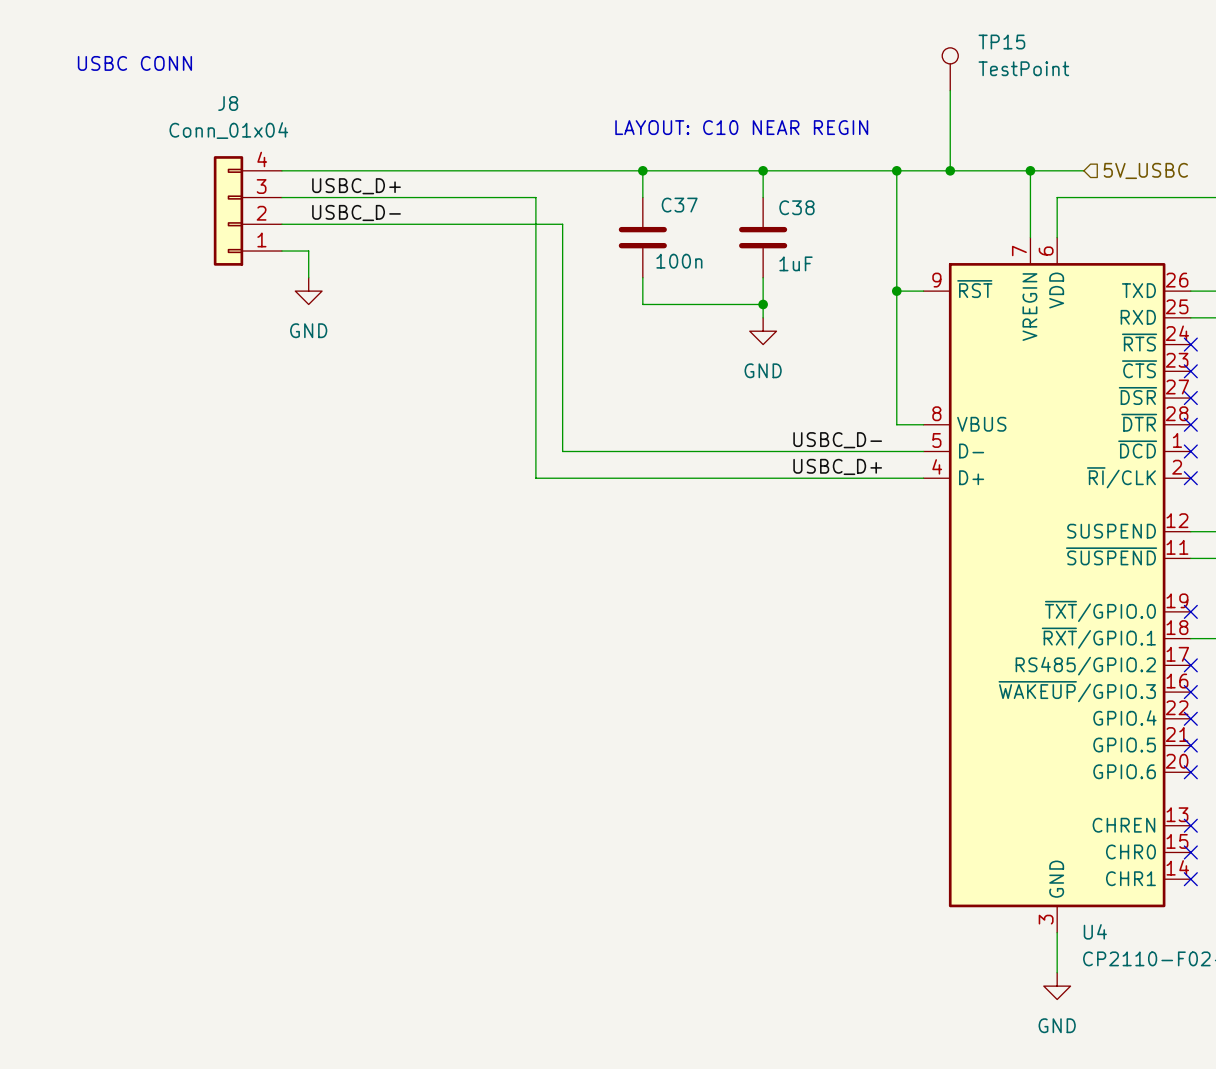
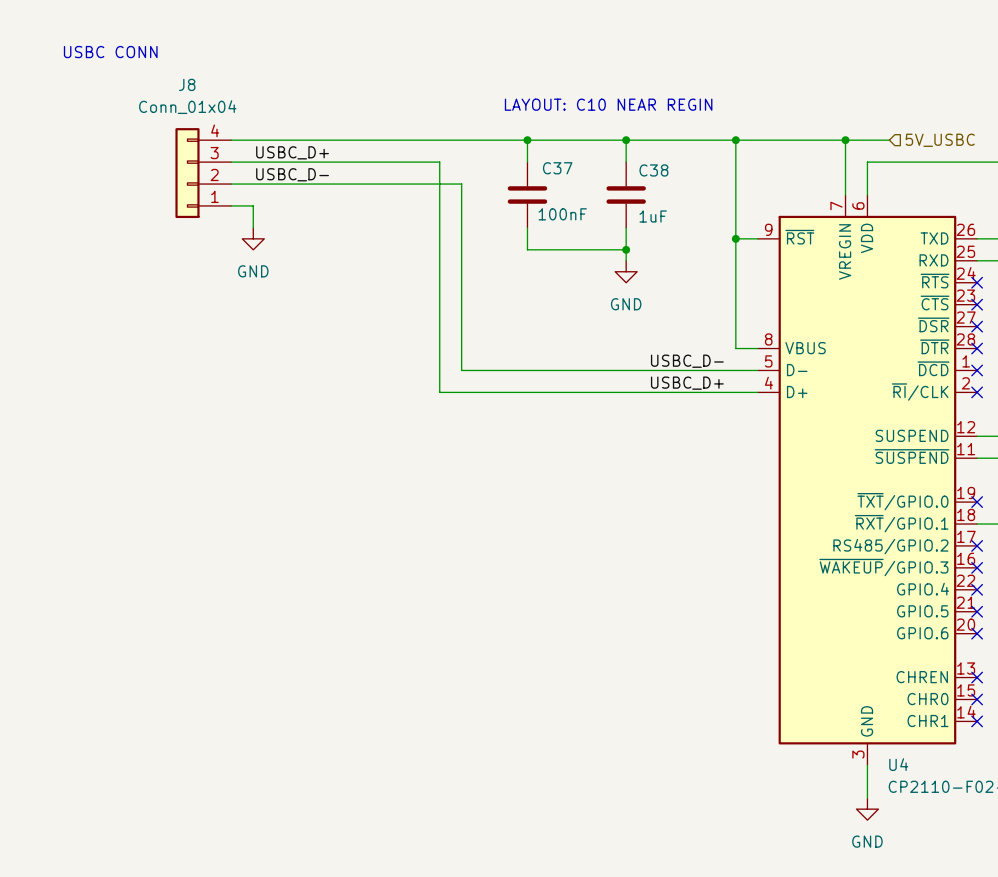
TP15: TestPoint (950, 69) -> none
wire: (950, 90) (950, 170) -> none
junction: (950, 170) -> none
C37 value: 100n (679, 261) -> 100nF (562, 214)

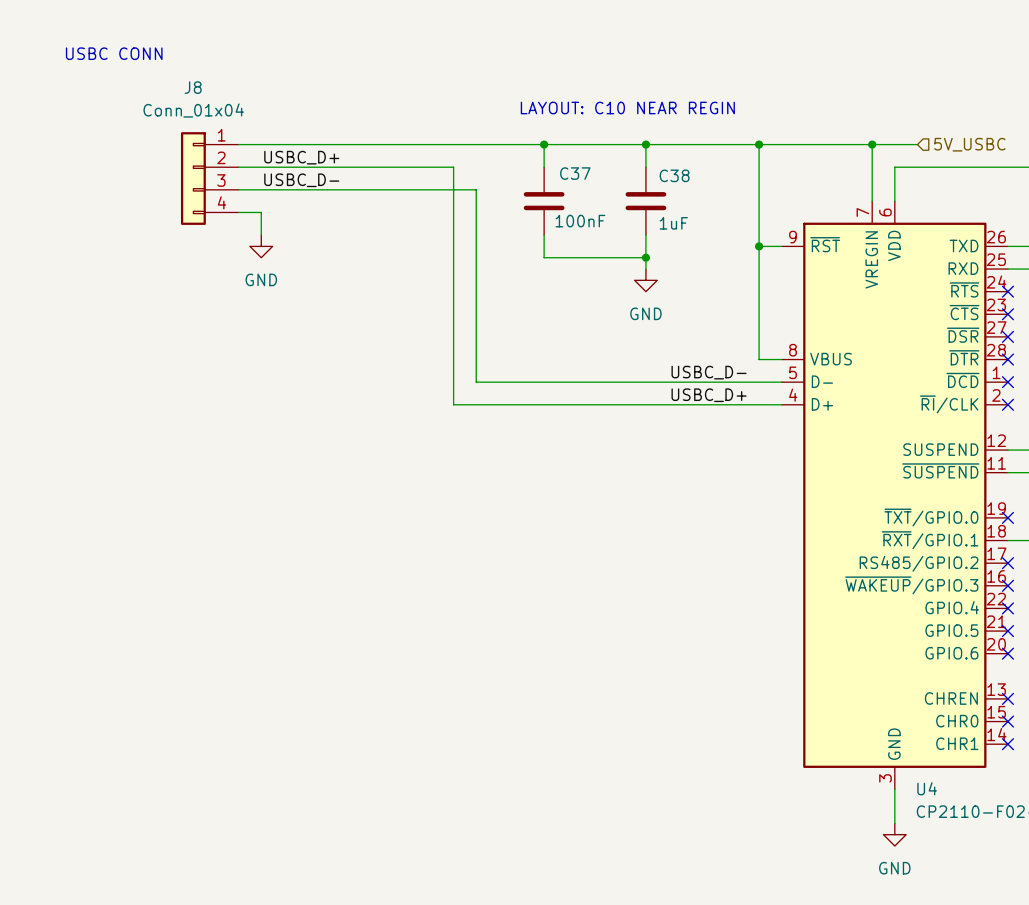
J8 flip: as is (187, 173) -> up-down (193, 178)

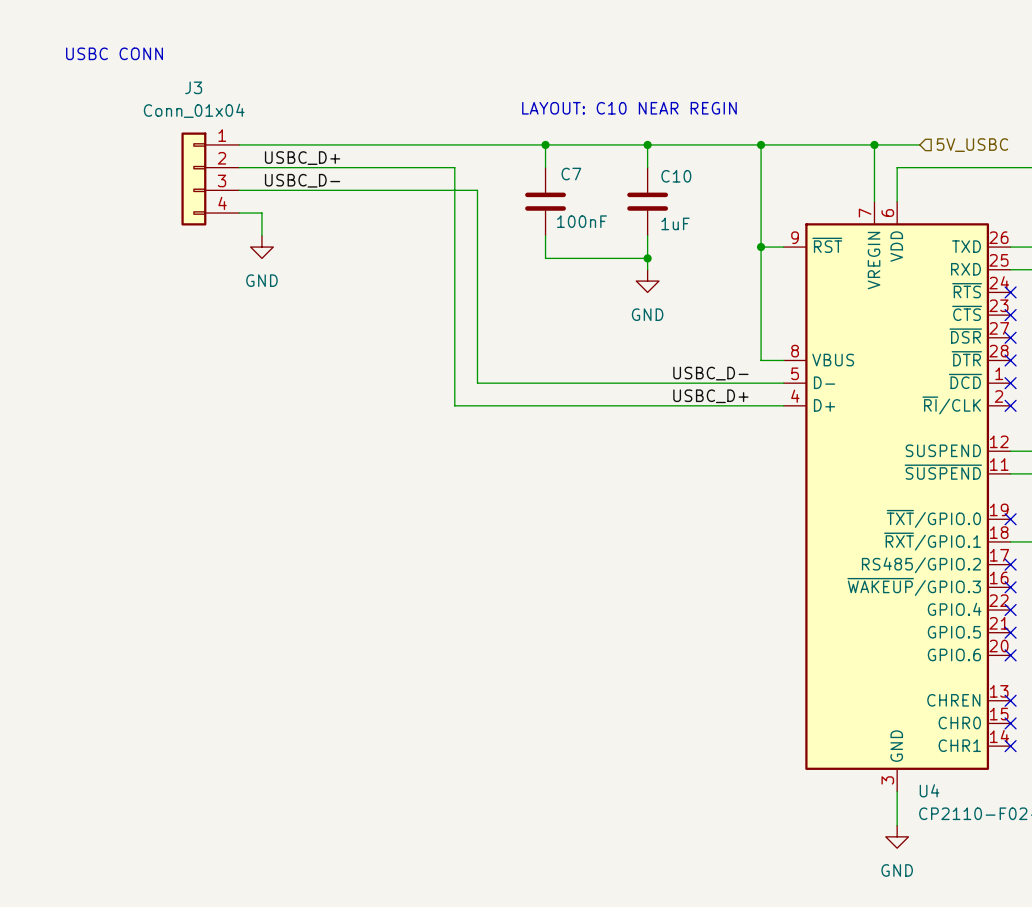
J8 name: J8 (193, 87) -> J3 (193, 87)
C37 name: C37 (575, 173) -> C7 (571, 174)
C38 name: C38 (674, 175) -> C10 (676, 176)

